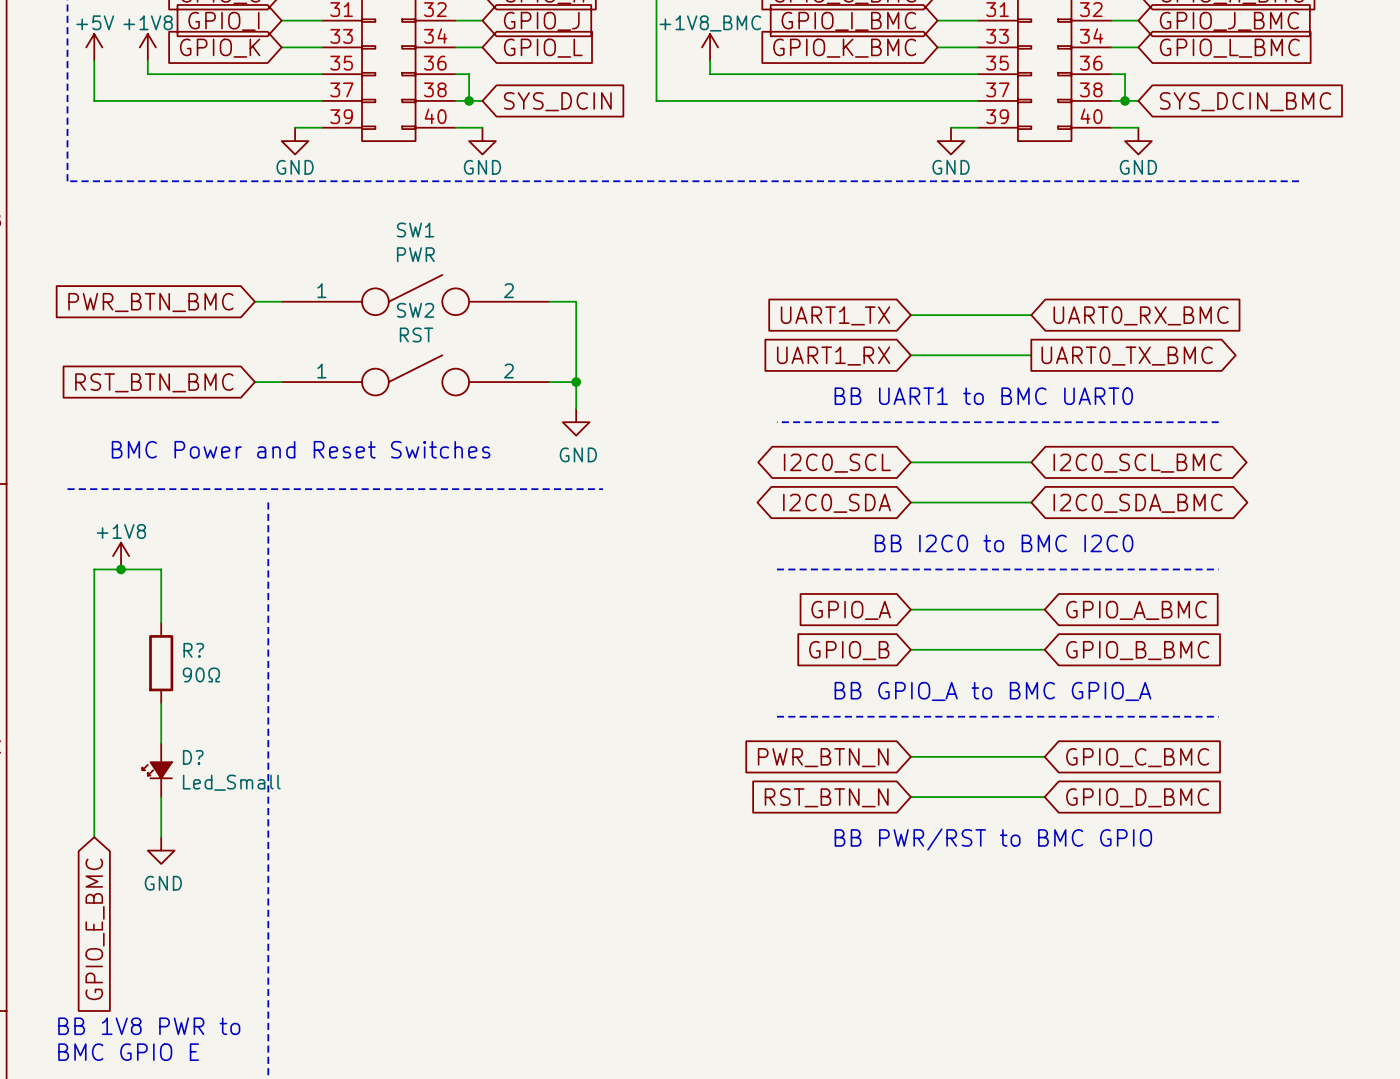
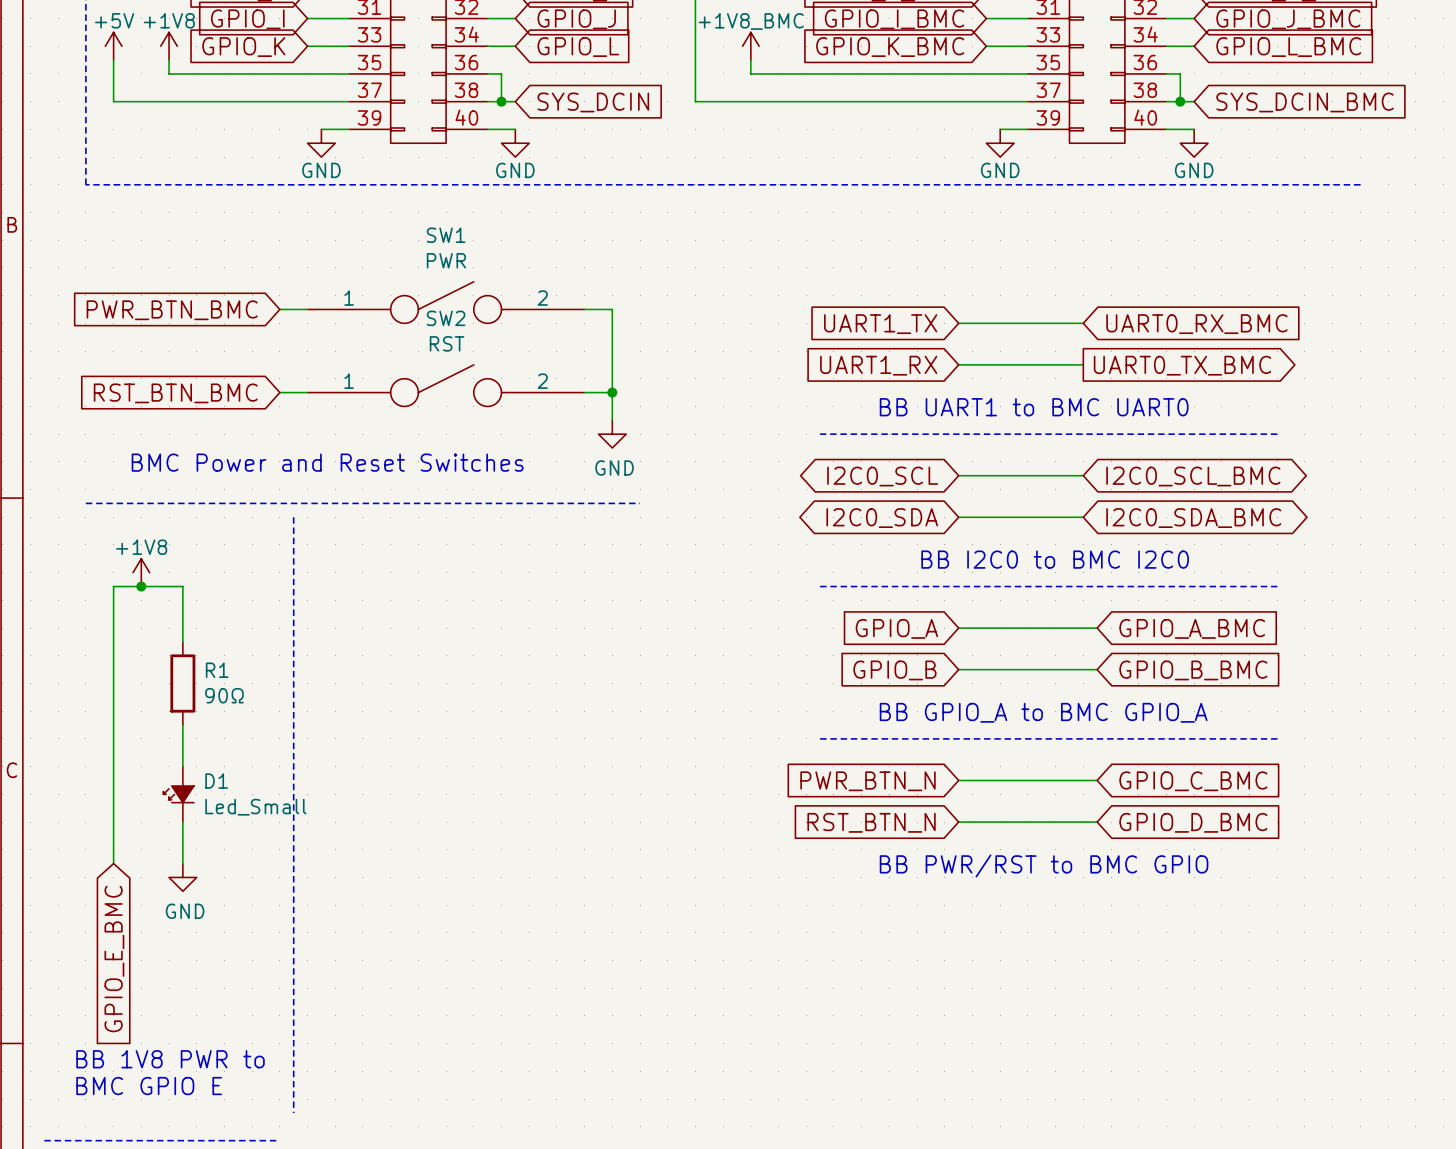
R? name: R? (193, 650) -> R1 (217, 670)
D? name: D? (193, 757) -> D1 (216, 781)

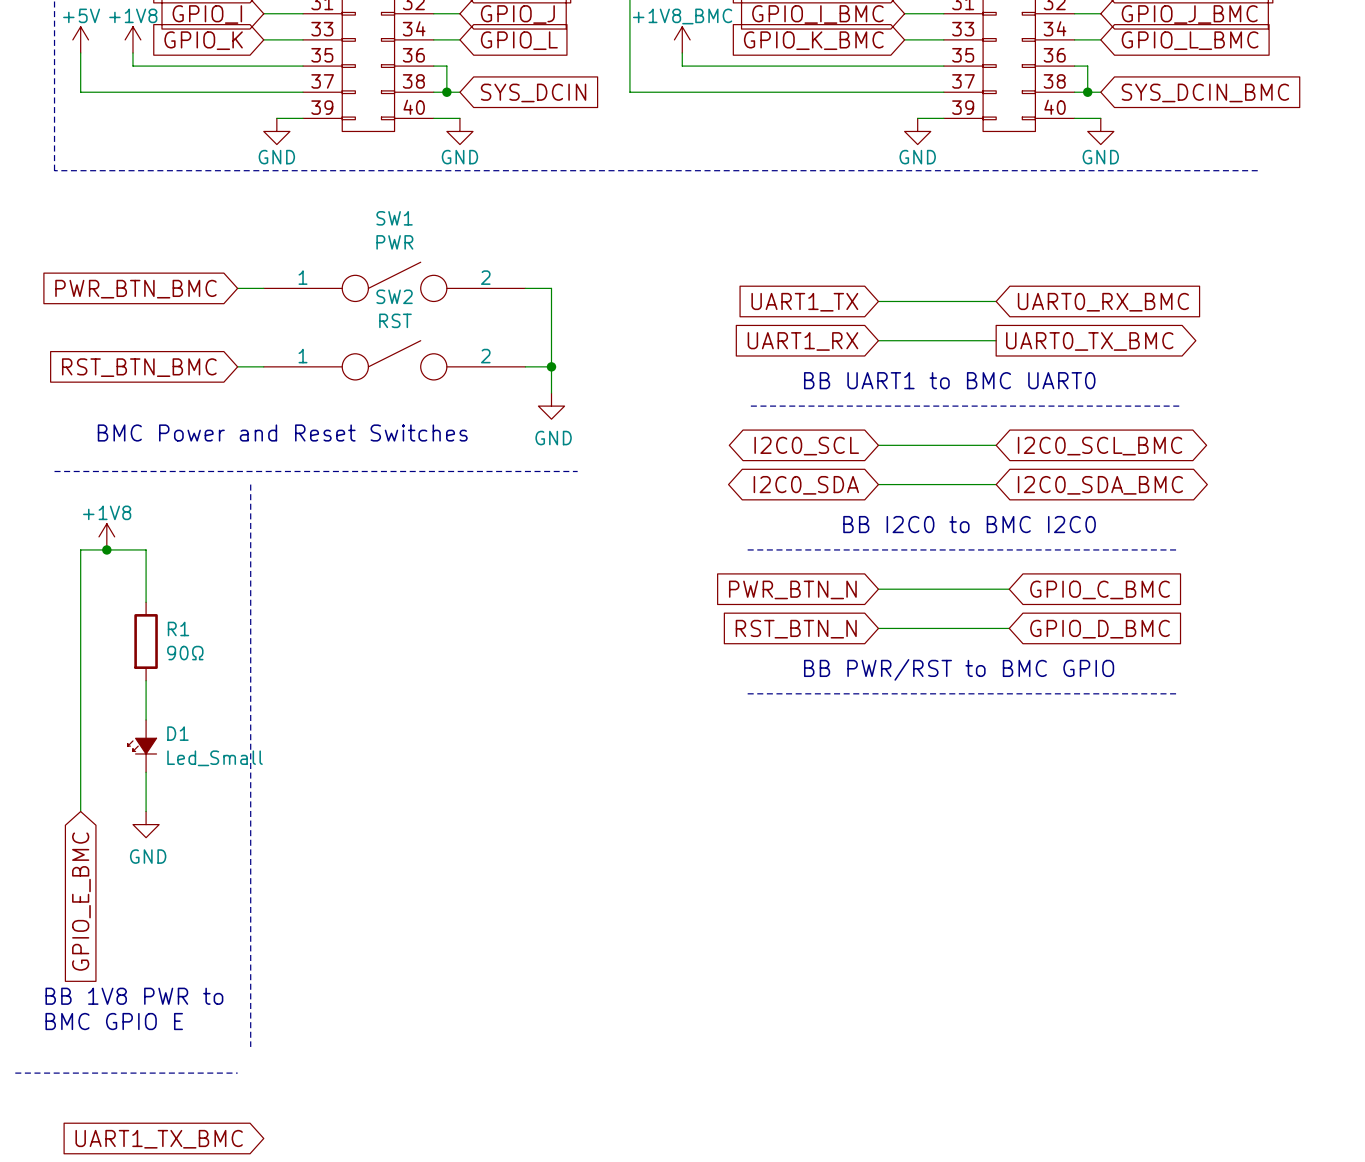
global label: GPIO_A (896, 628) -> PWR_BTN_N (792, 589)
global label: GPIO_A_BMC (1192, 628) -> GPIO_C_BMC (1100, 589)
global label: GPIO_B (894, 670) -> RST_BTN_N (796, 629)
global label: GPIO_B_BMC (1193, 670) -> GPIO_D_BMC (1100, 629)
text: BB GPIO_A to BMC GPIO_A (1043, 712) -> BB PWR/RST to BMC GPIO (959, 669)
wire: (958, 780) (1097, 780) -> none
global label: PWR_BTN_N (868, 781) -> none
global label: GPIO_C_BMC (1193, 781) -> none
global label: RST_BTN_N (871, 822) -> none
wire: (958, 822) (1097, 822) -> none
global label: GPIO_D_BMC (1193, 822) -> none
text: BB PWR/RST to BMC GPIO (1044, 865) -> none

